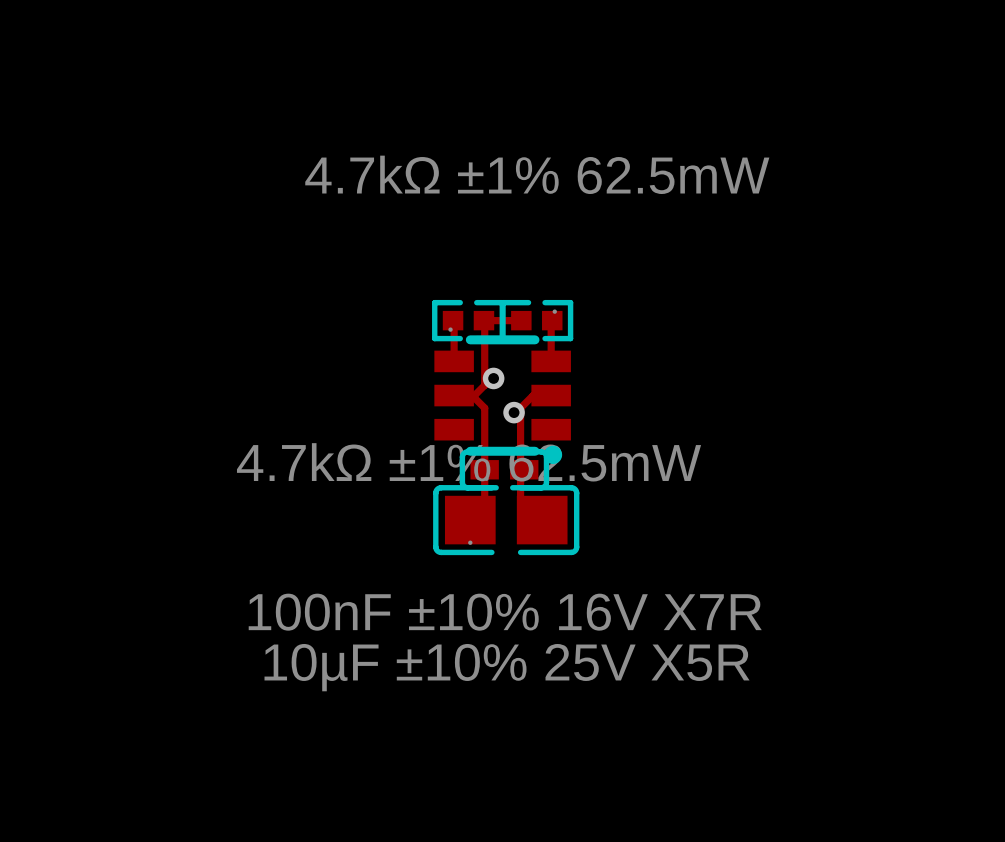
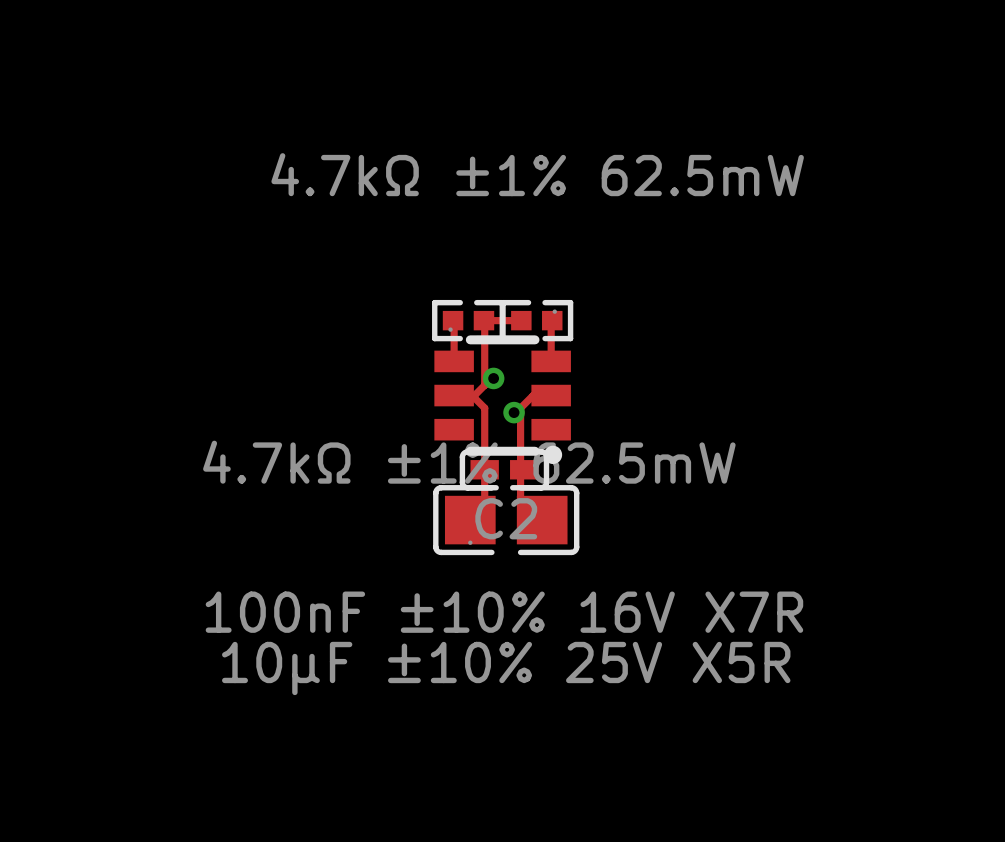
part: 10µF ±10% 25V X5R (506, 520) -> none
C2: none -> 10µF ±10% 25V X5R (506, 520)

